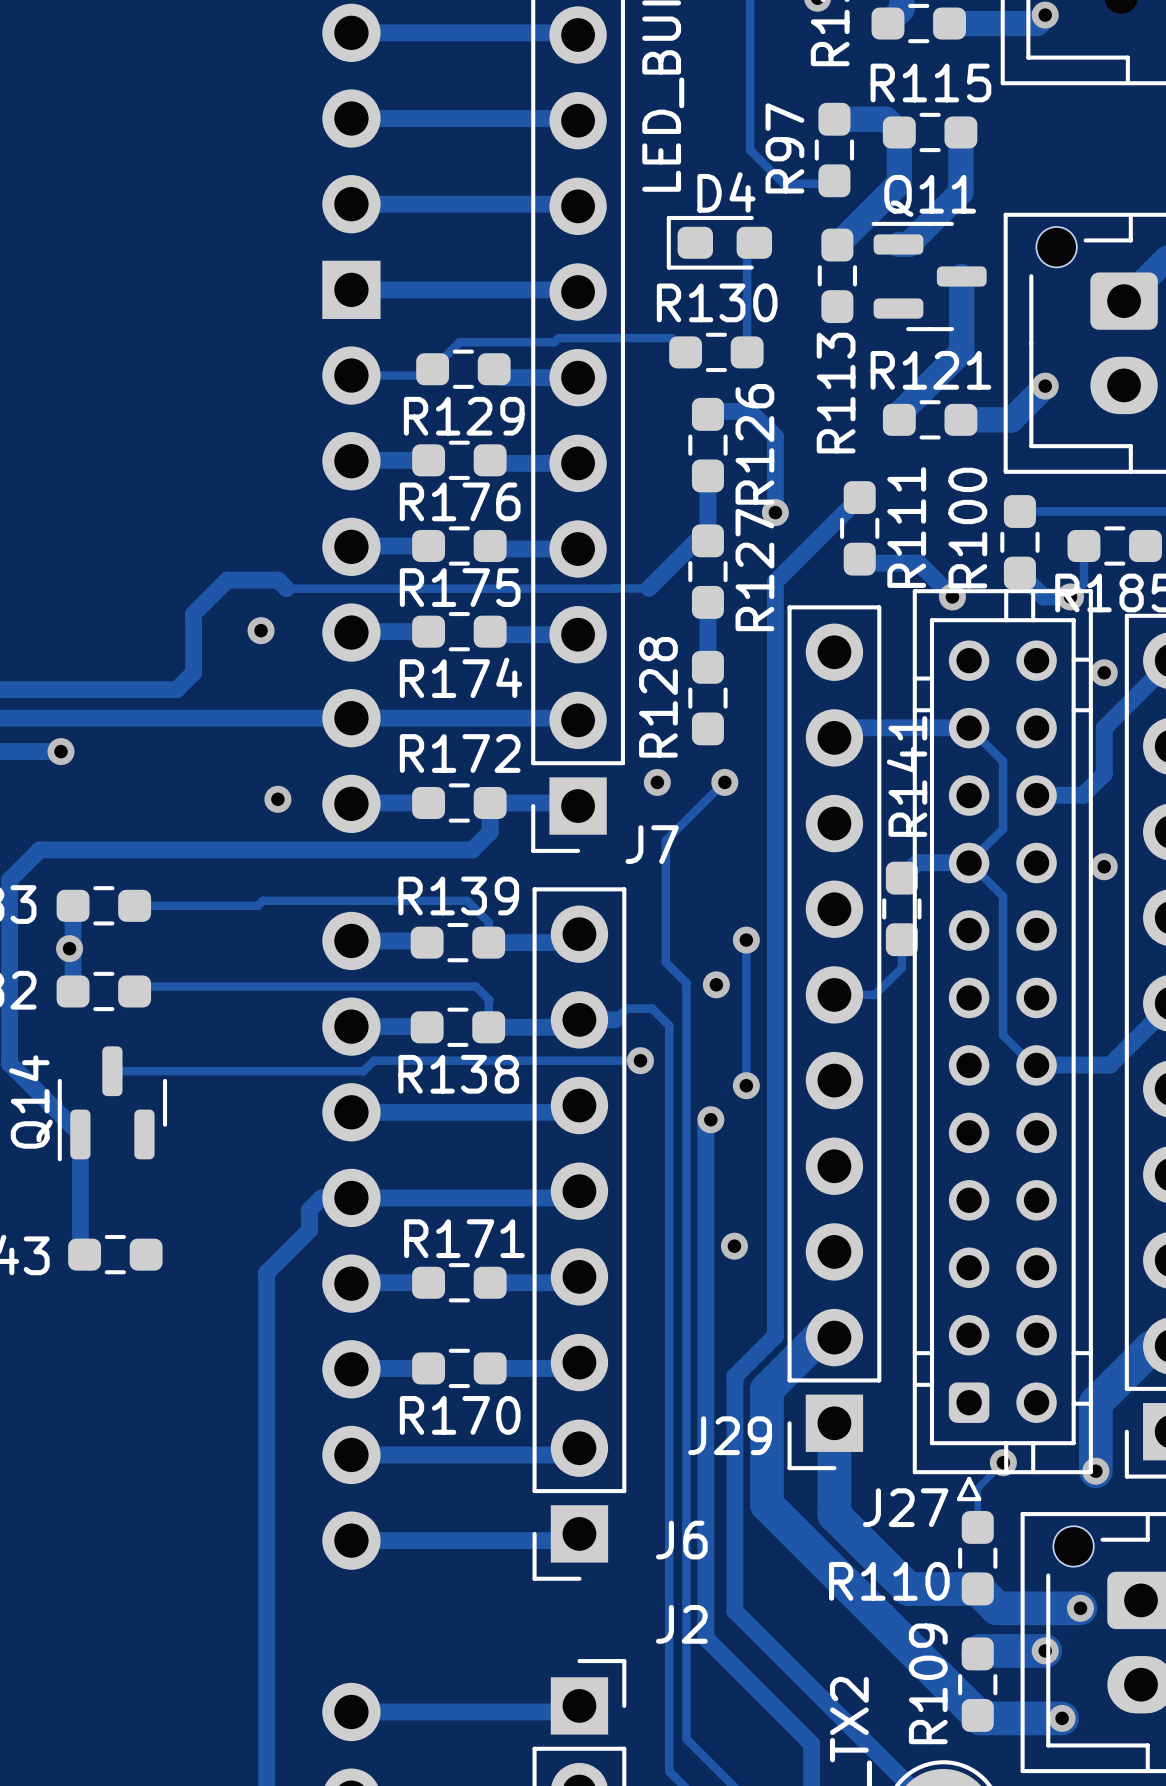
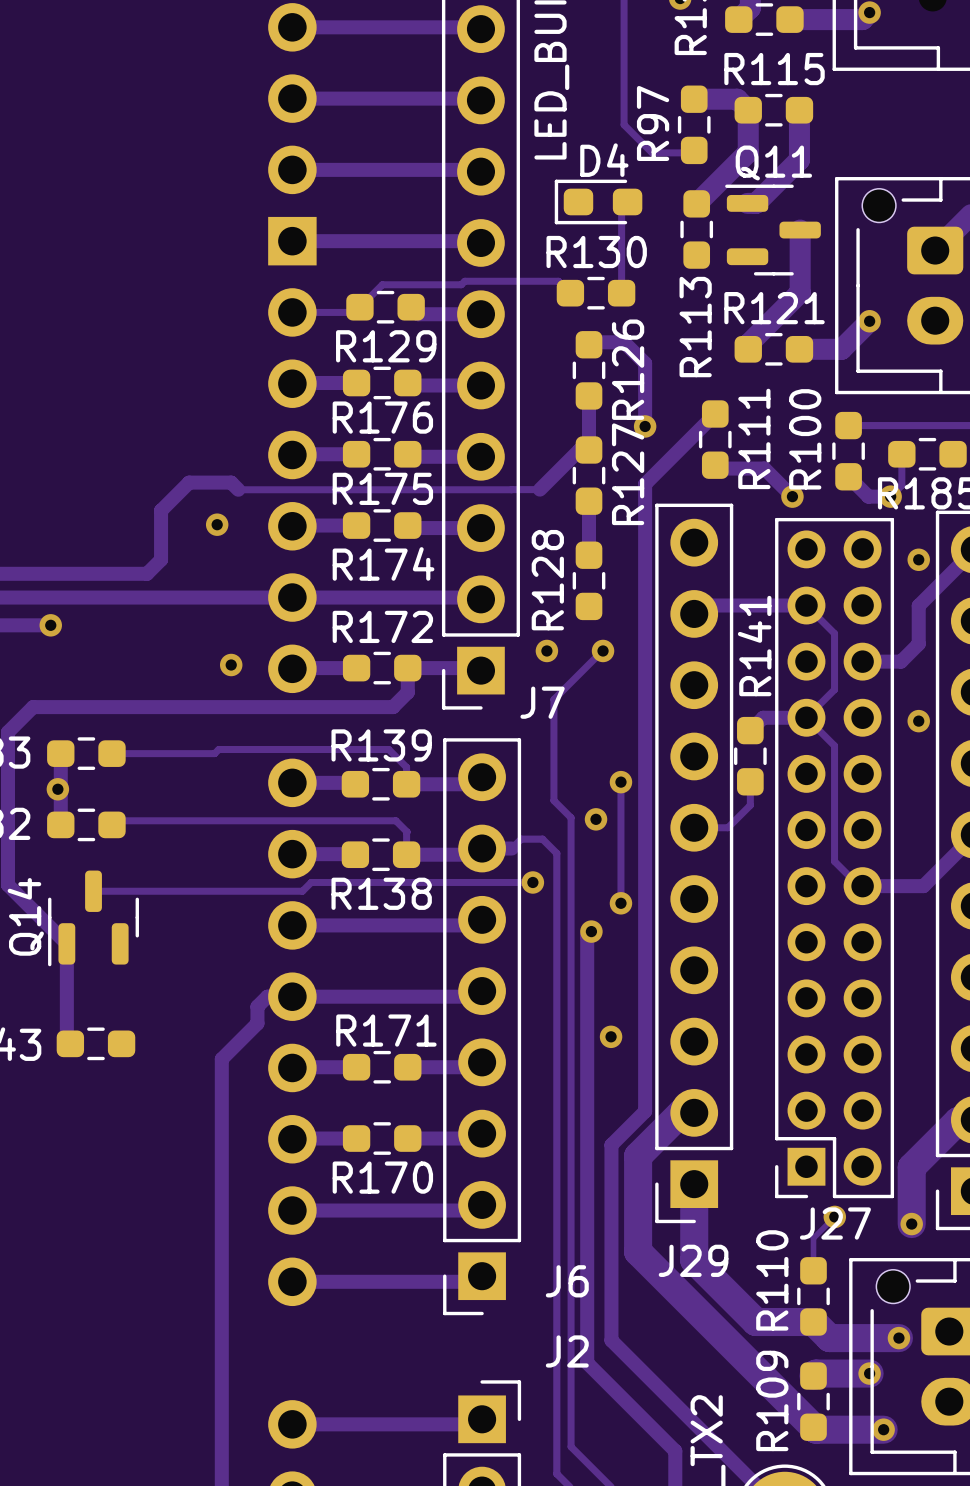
J27 footprint: [912, 589, 1093, 1502] -> [775, 517, 895, 1199]
J29 name position: J29 (730, 1435) -> J29 (693, 1260)
J27 name position: J27 (905, 1507) -> J27 (835, 1223)
R110 name rotation: 0° (889, 1581) -> 90° counterclockwise (772, 1280)

